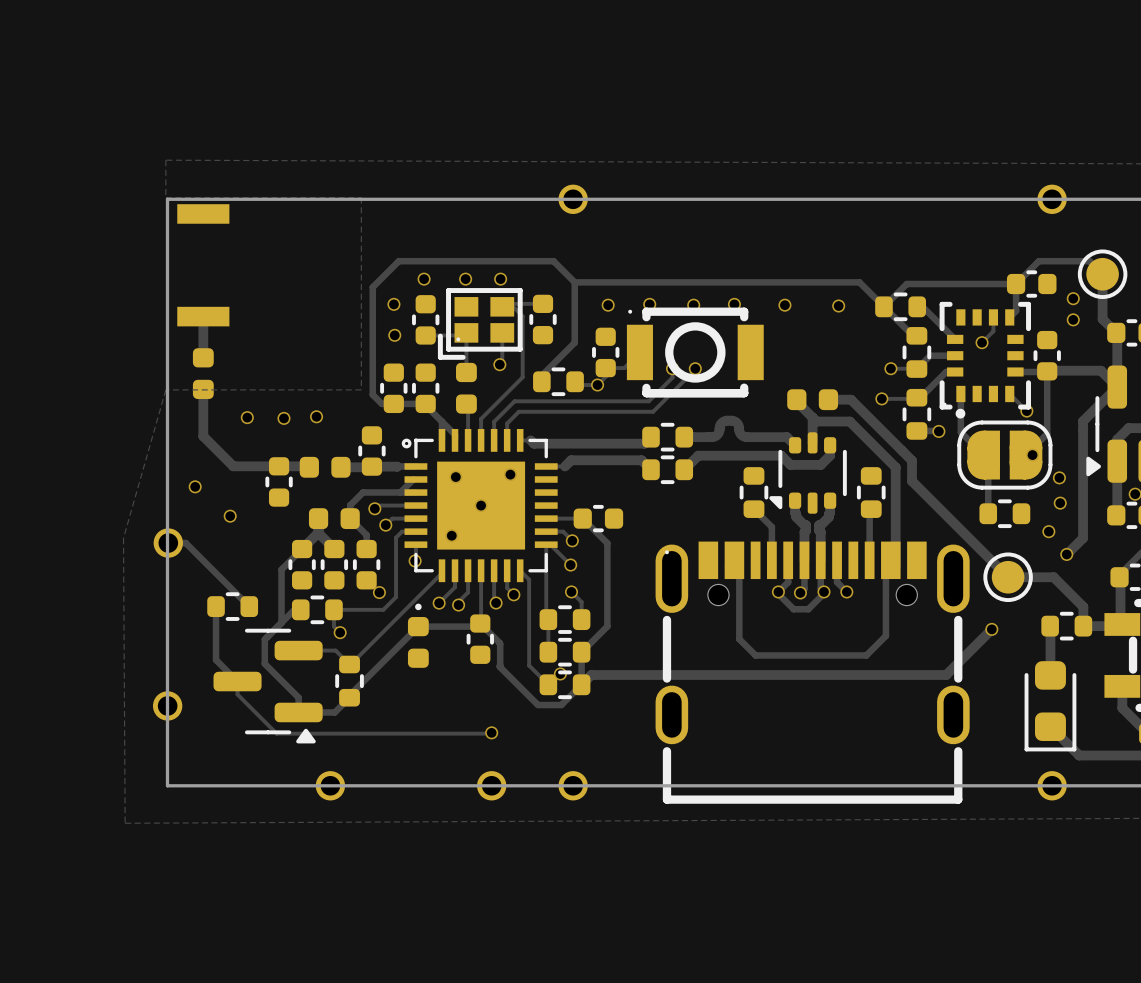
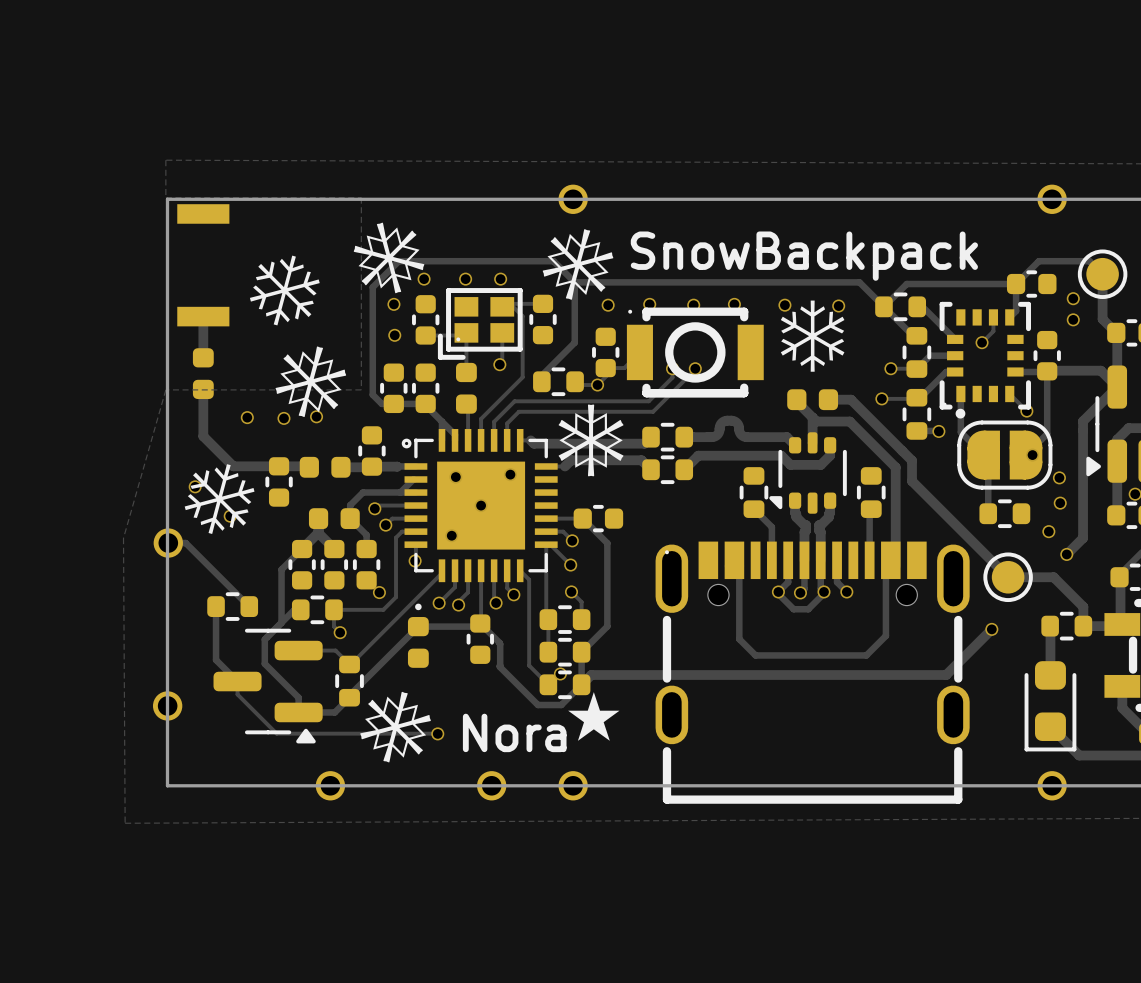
drawing: none -> [249, 222, 425, 418]
drawing: none -> [542, 229, 614, 300]
text: none -> SnowBackpack (804, 256)
drawing: none -> [780, 300, 845, 372]
drawing: none -> [558, 404, 624, 477]
drawing: none -> [184, 464, 255, 534]
drawing: none -> [360, 691, 431, 763]
text: none -> ⋆ (593, 716)
track: (491, 732) (437, 733) -> none
via position: (491, 732) -> (437, 733)
text: none -> Nora (514, 732)

